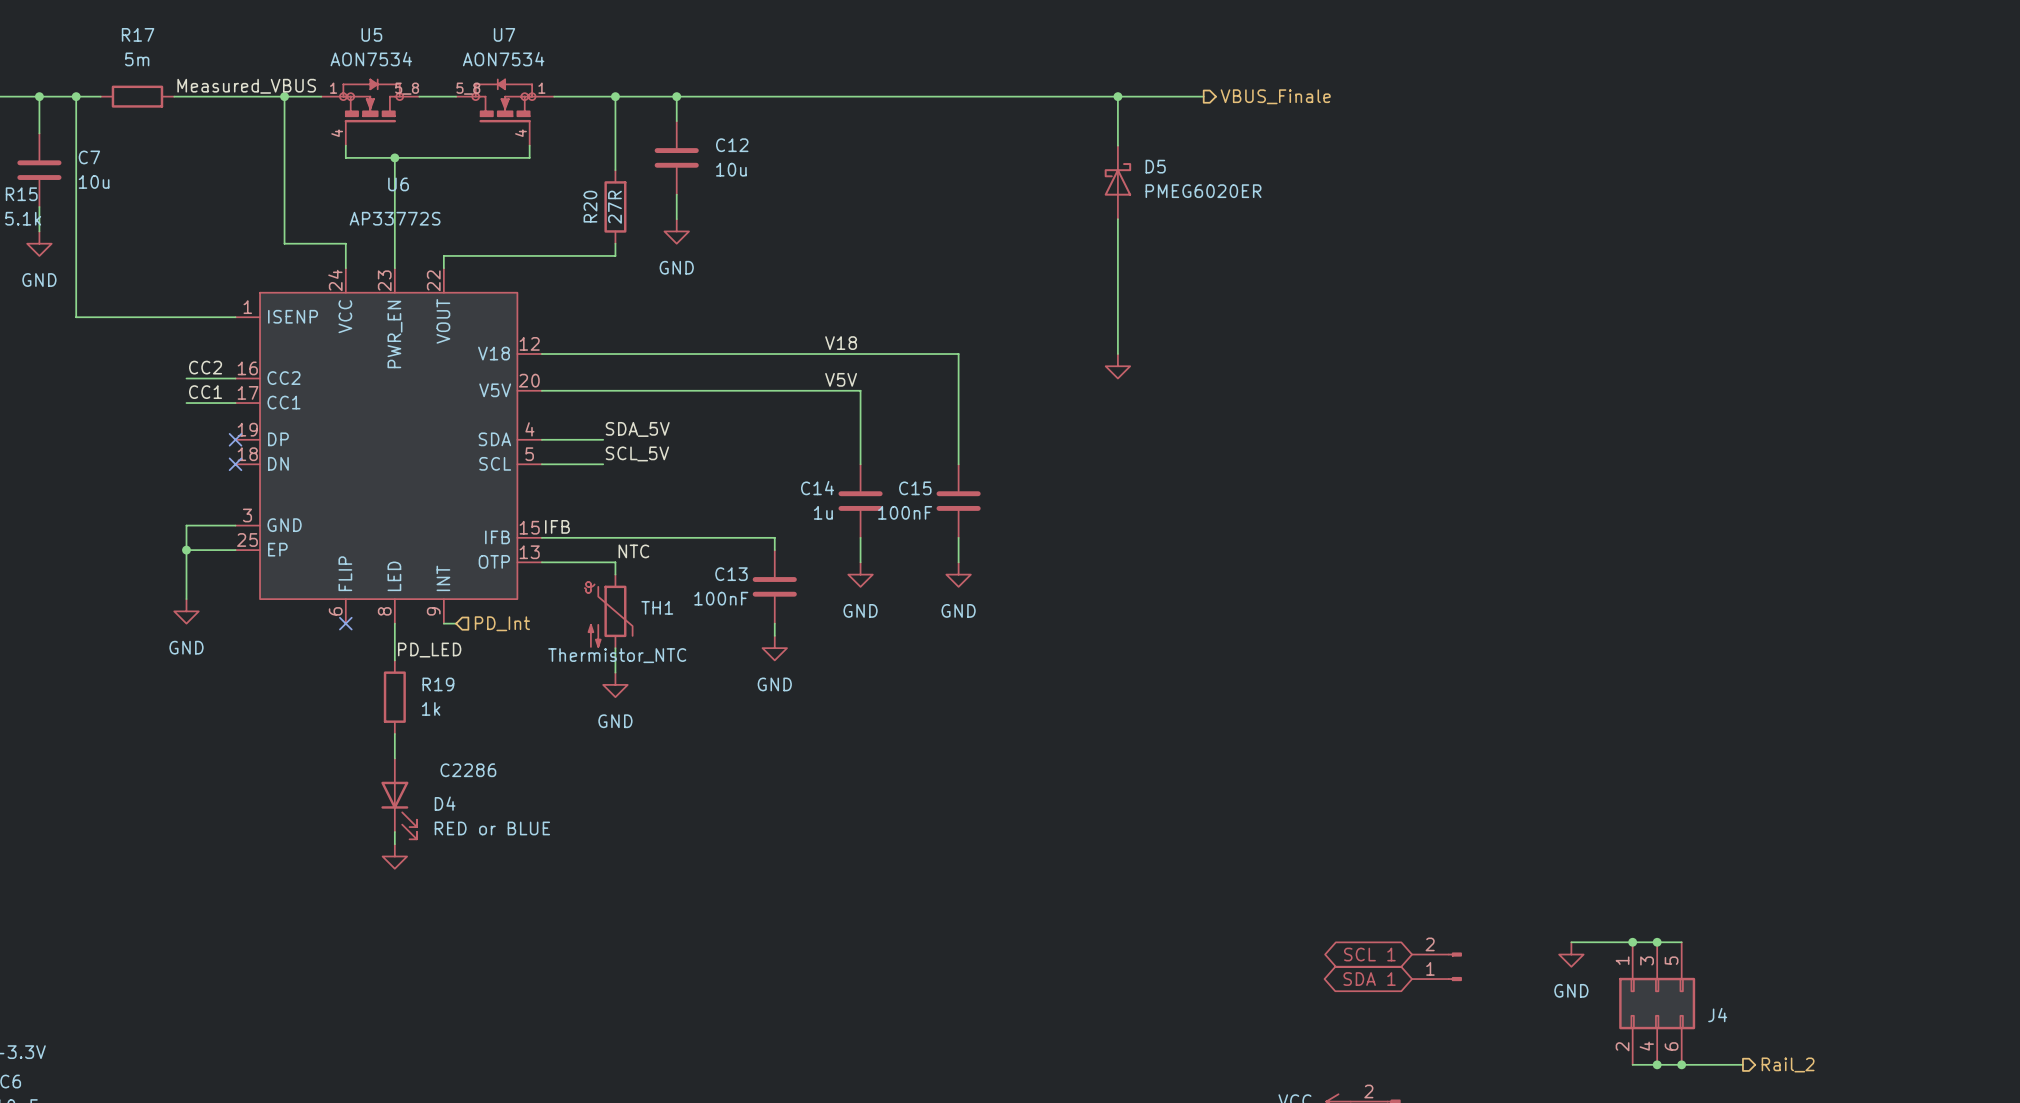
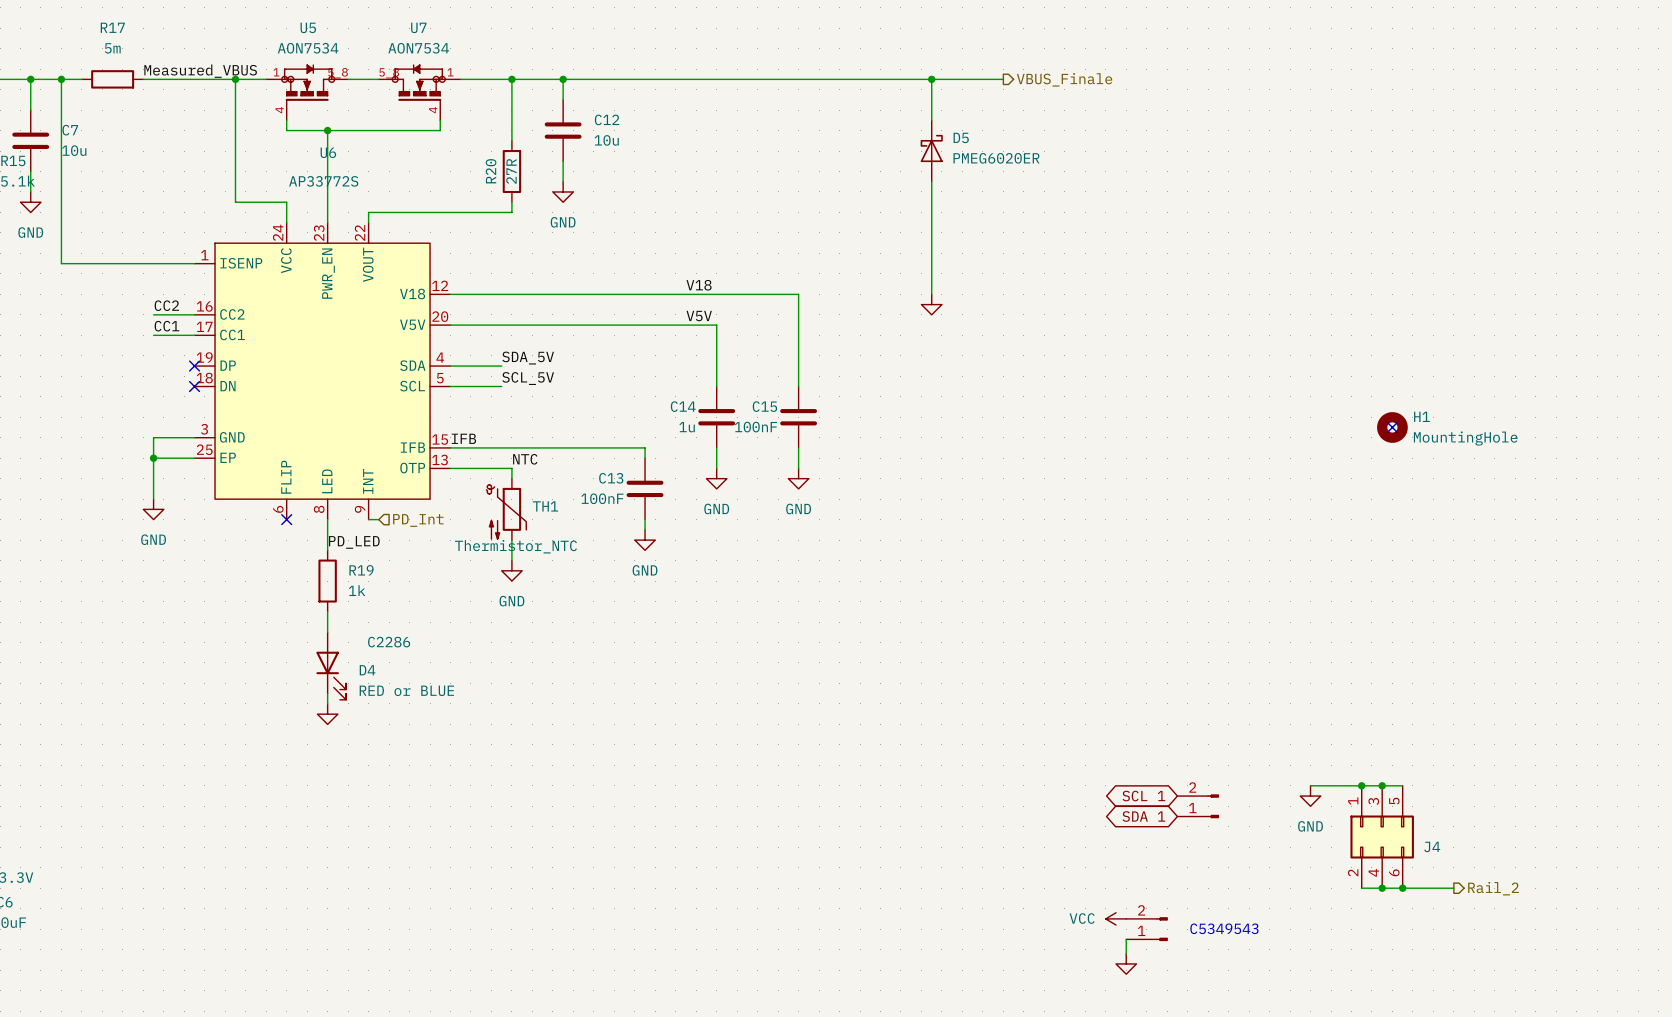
no-connect mark: none -> (1392, 427)
H1: none -> MountingHole (1392, 427)

